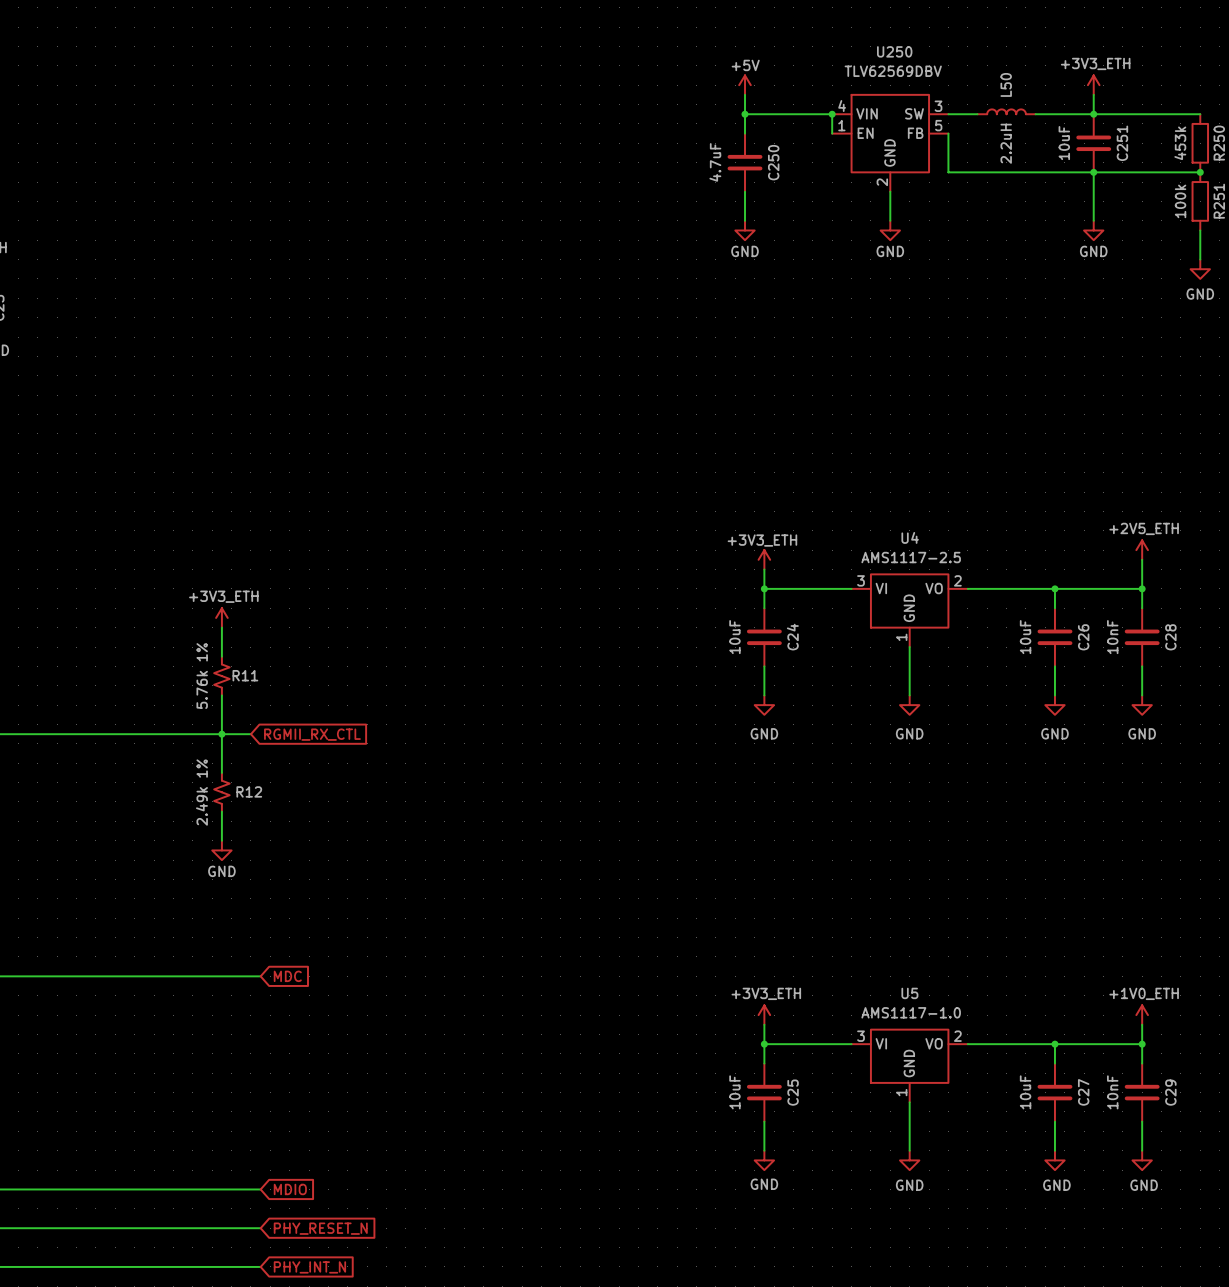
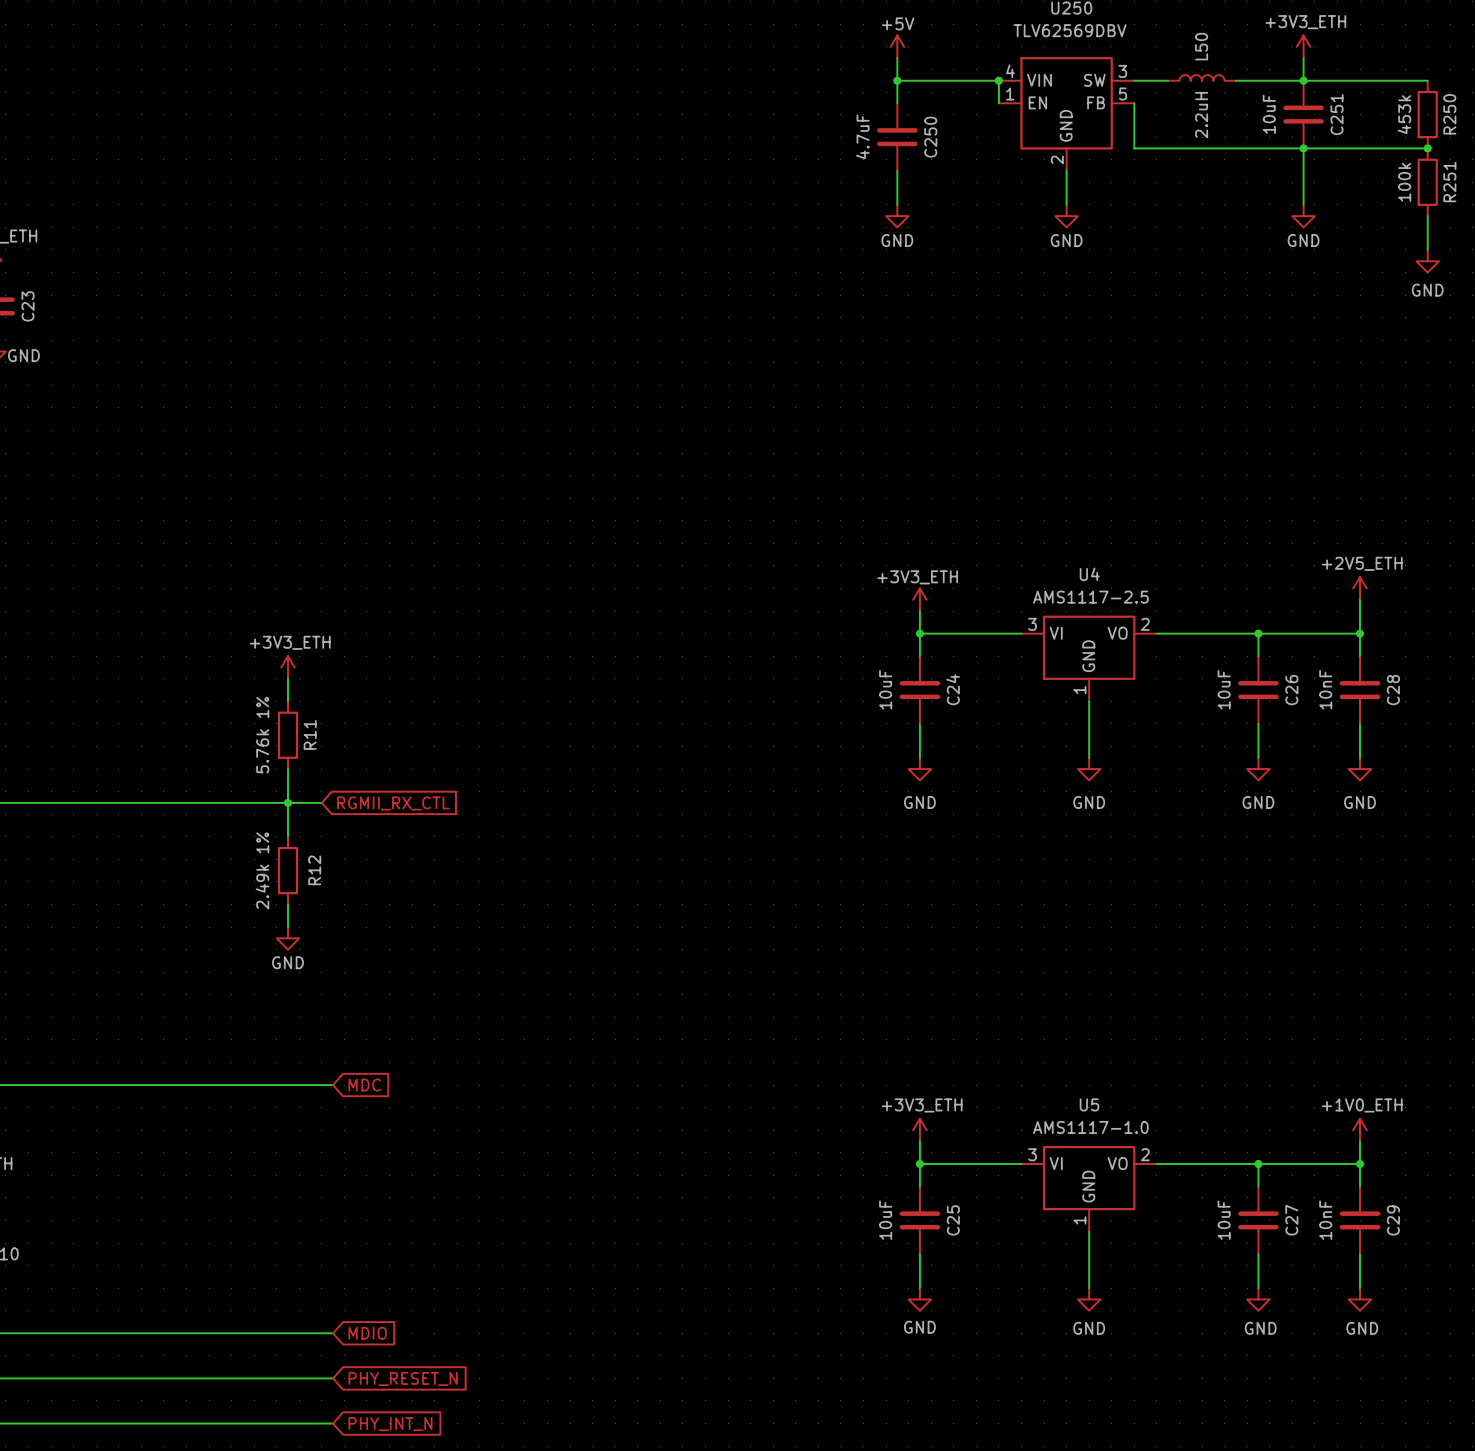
R11 symbol: [214, 656, 230, 696] -> [277, 701, 299, 770]
R12 symbol: [214, 772, 230, 812] -> [277, 836, 299, 905]

